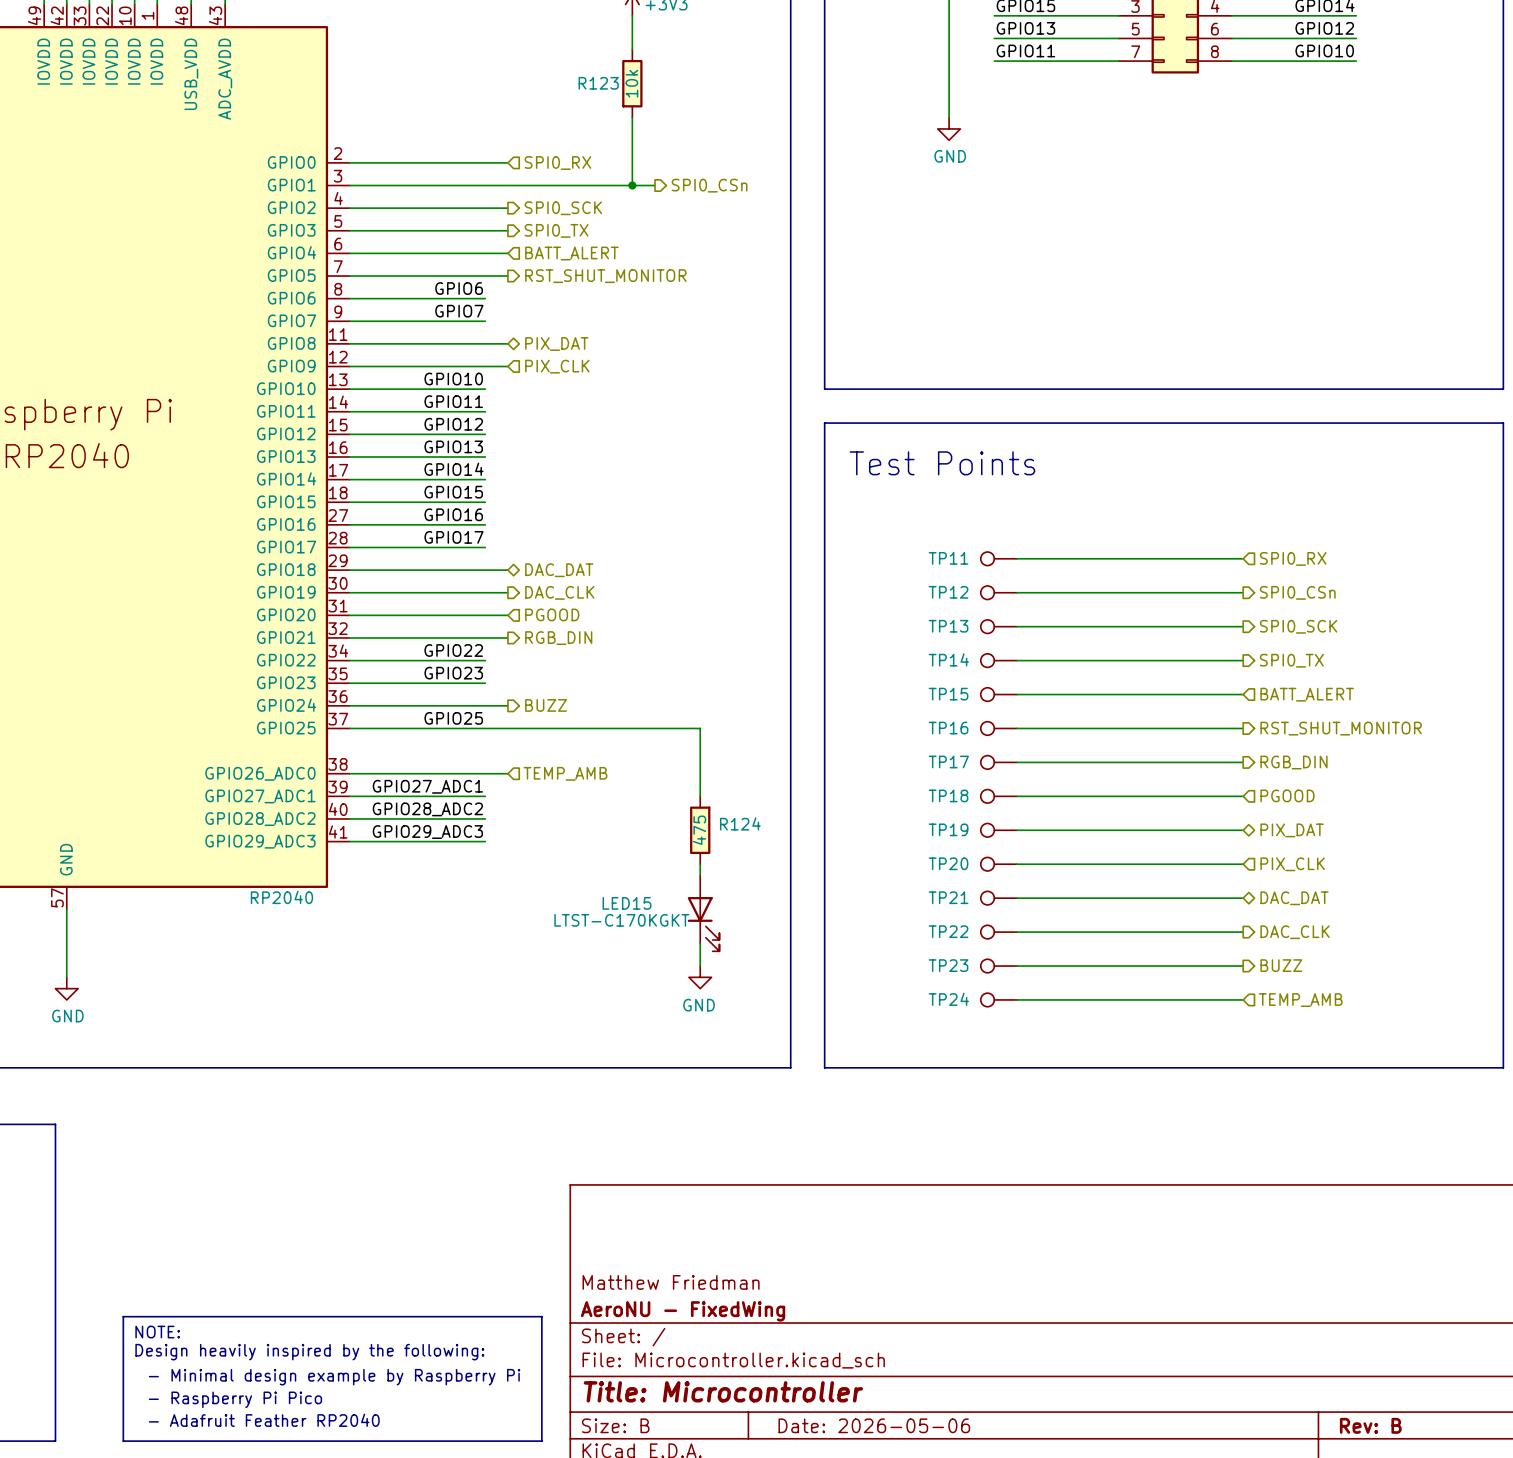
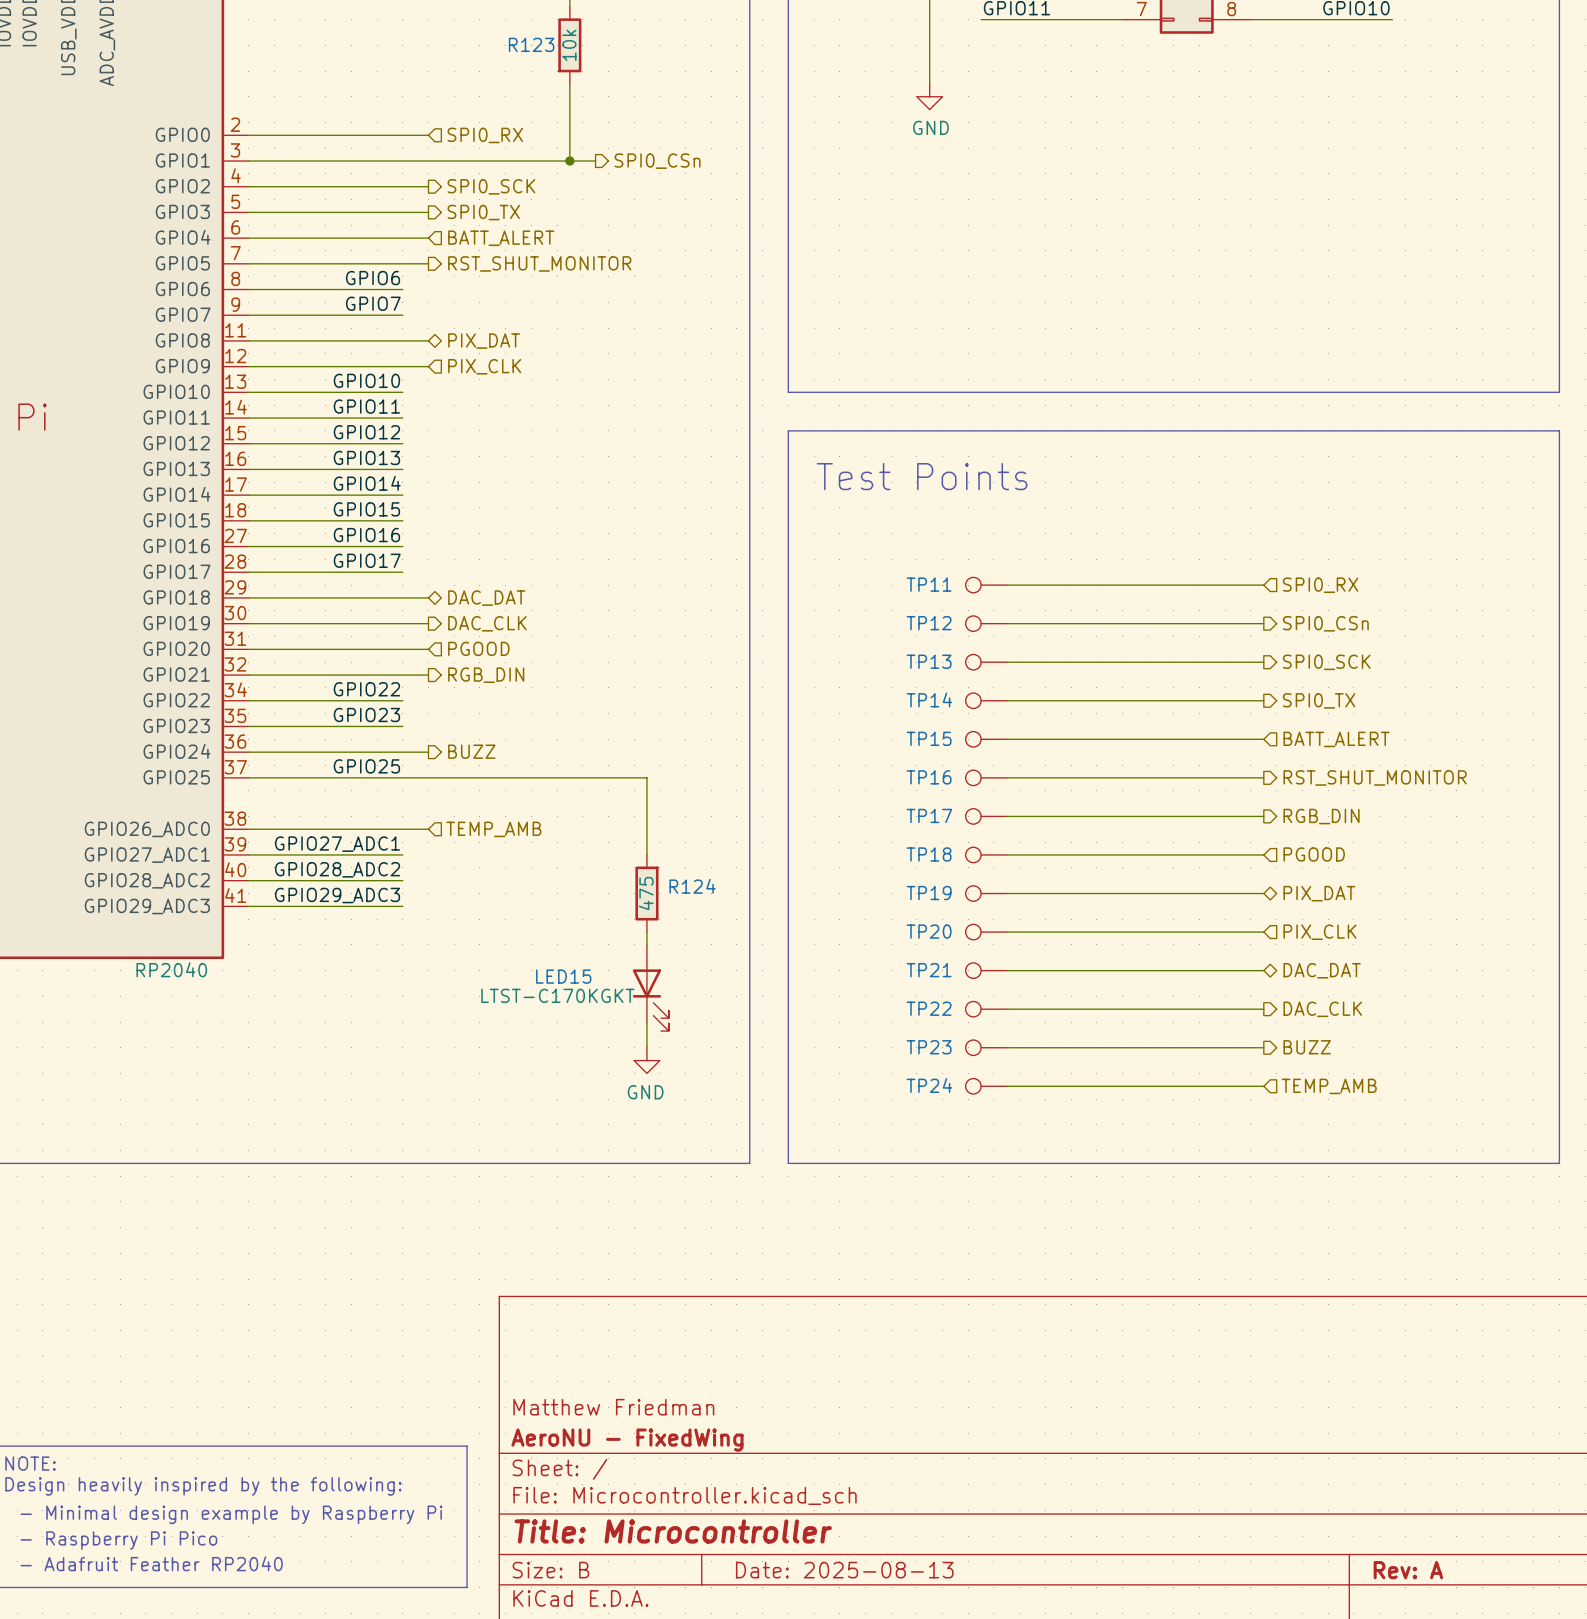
title block: Date: 2026-05-06 (874, 1425) -> Date: 2025-08-13 (844, 1570)
title block: Rev: B (1370, 1425) -> Rev: A (1408, 1570)

